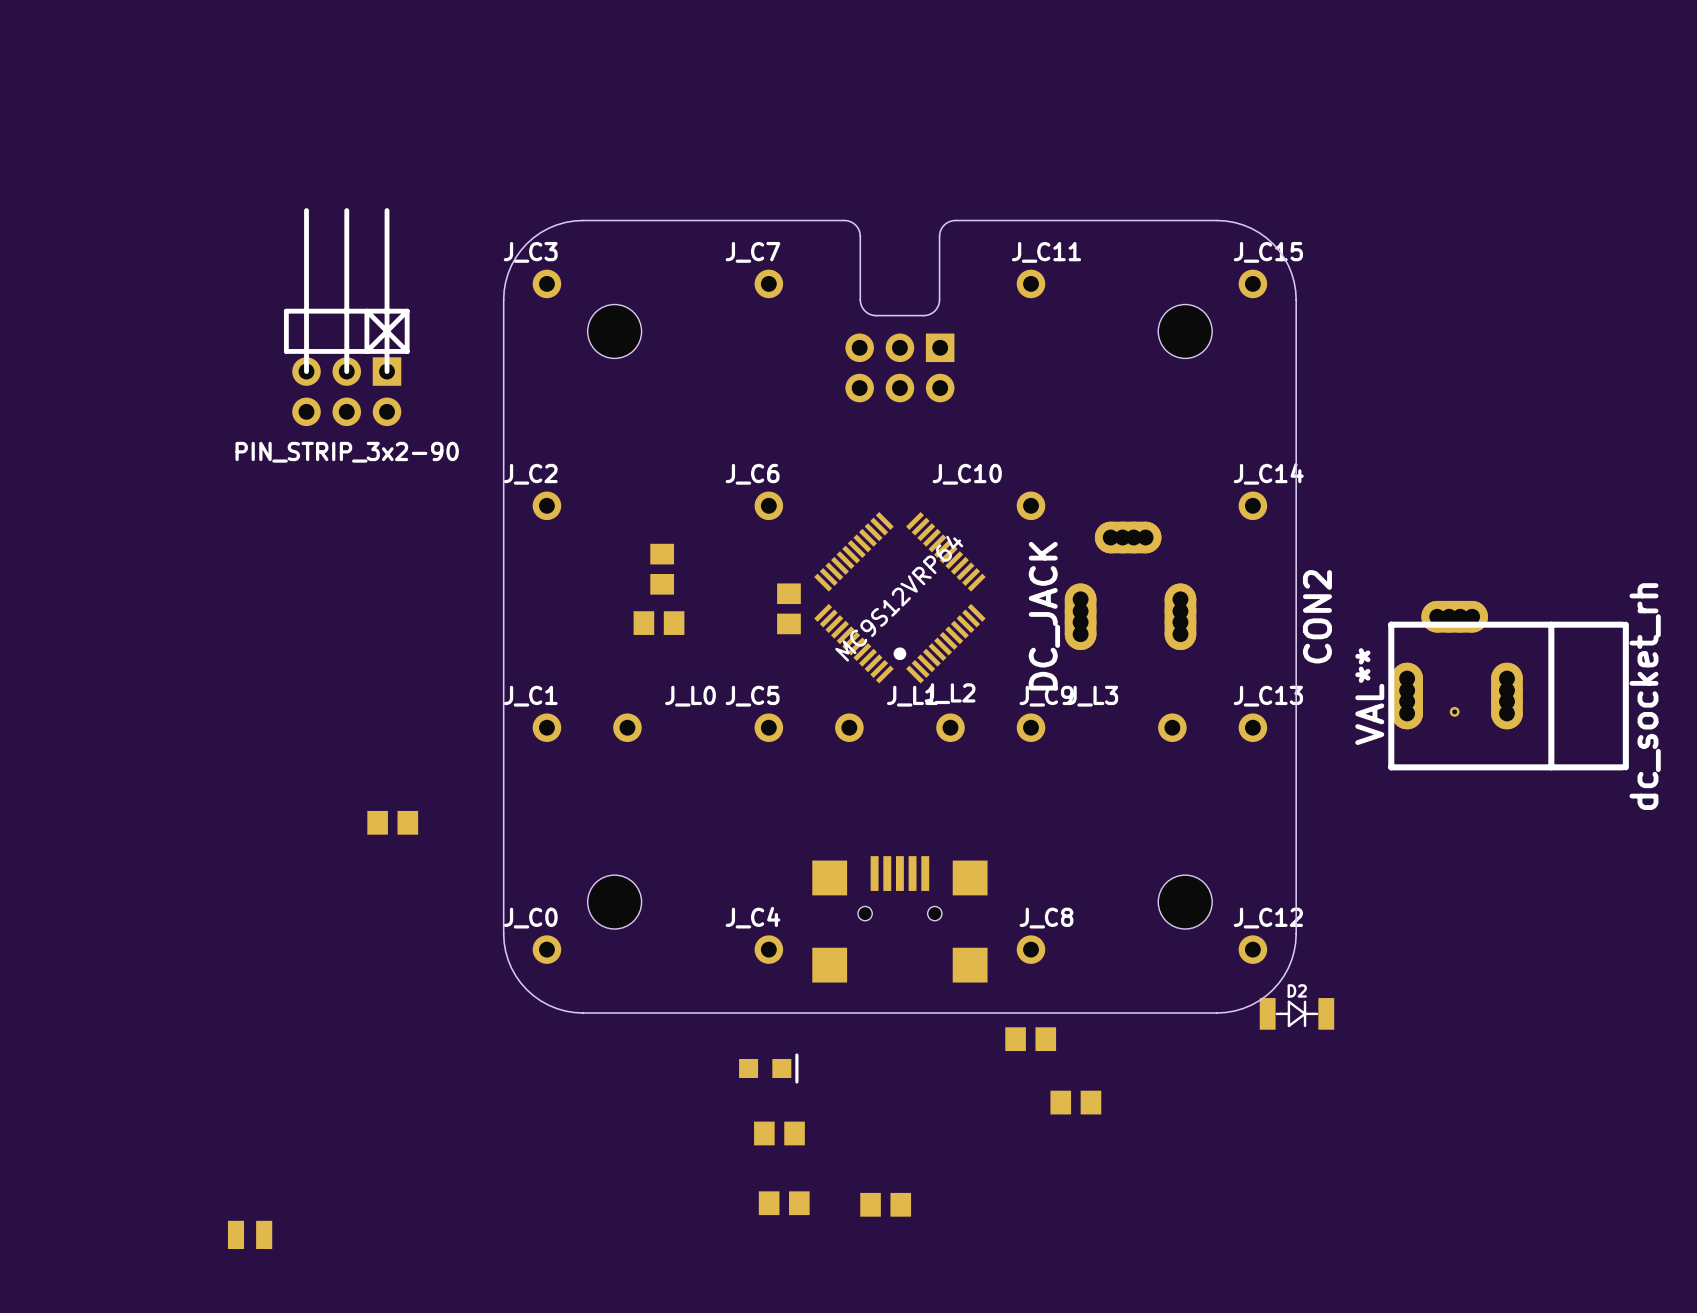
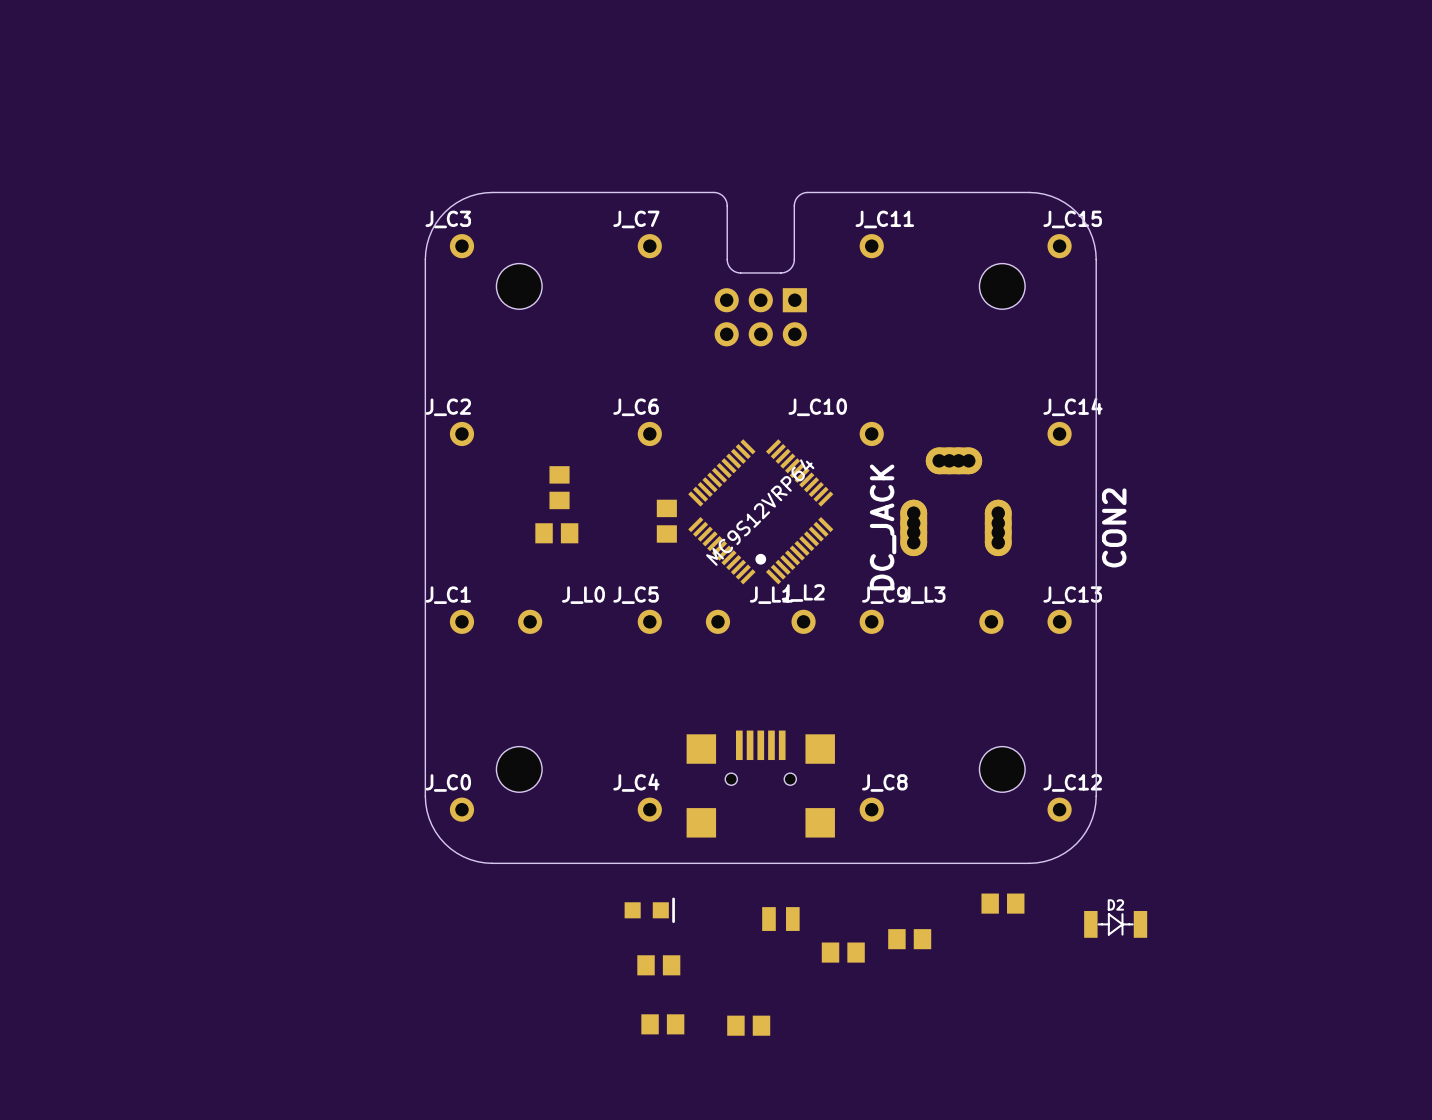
PIN_STRIP_3x2-90: (346, 317) -> none
dc_socket_rh: VAL** (1508, 685) -> none
part: (1454, 711) -> none
part: (392, 822) -> none
D2 position: (1296, 1013) -> (1115, 924)
part: (1030, 1039) -> none
part: none -> (1002, 903)
part: none -> (780, 919)
part: none -> (843, 952)
part: (250, 1234) -> none

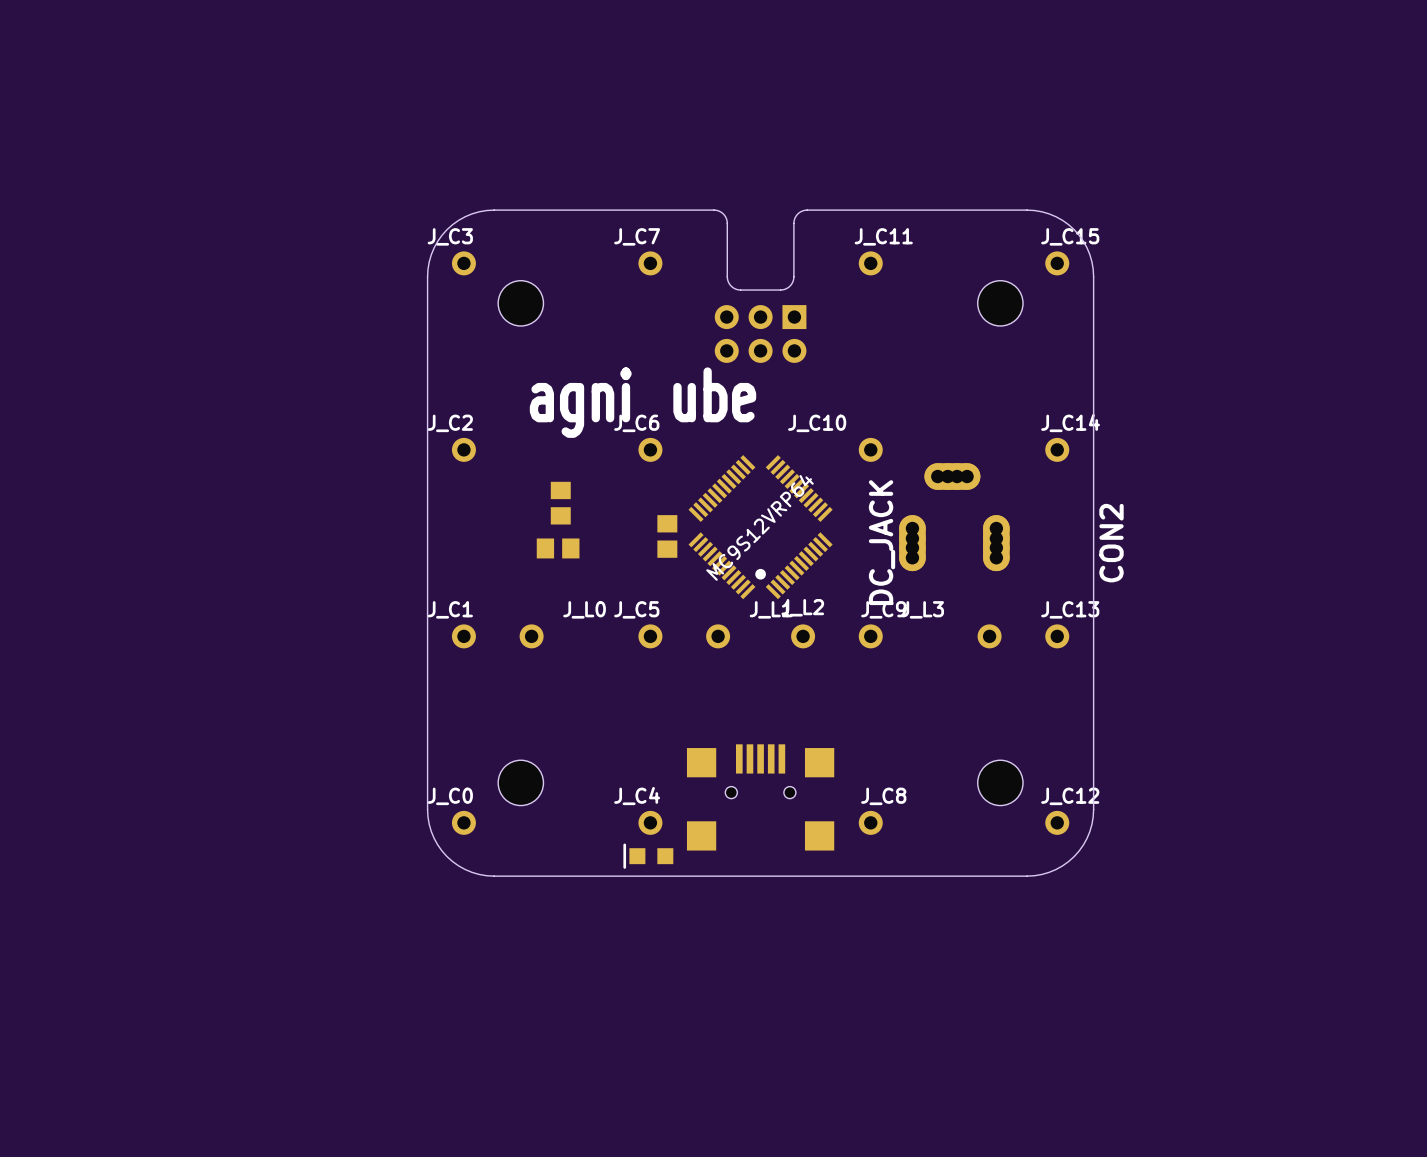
text: none -> ube (714, 394)
text: none -> agni (580, 402)
part: (1002, 903) -> none
part rotation: 0° (649, 910) -> 180° (648, 856)
part position: (649, 910) -> (648, 856)
part: (780, 919) -> none
D2: (1115, 924) -> none
part: (909, 939) -> none
part: (843, 952) -> none
part: (658, 965) -> none
part: (662, 1024) -> none
part: (748, 1025) -> none

